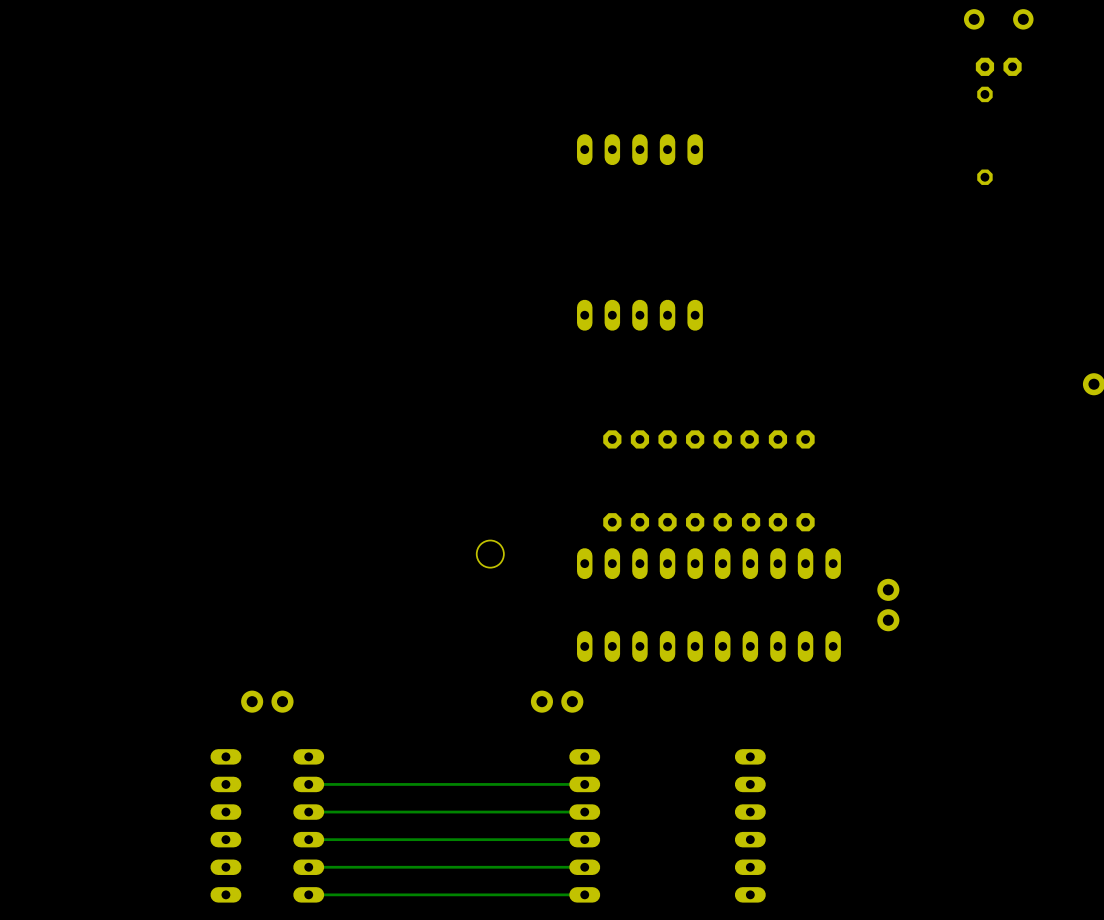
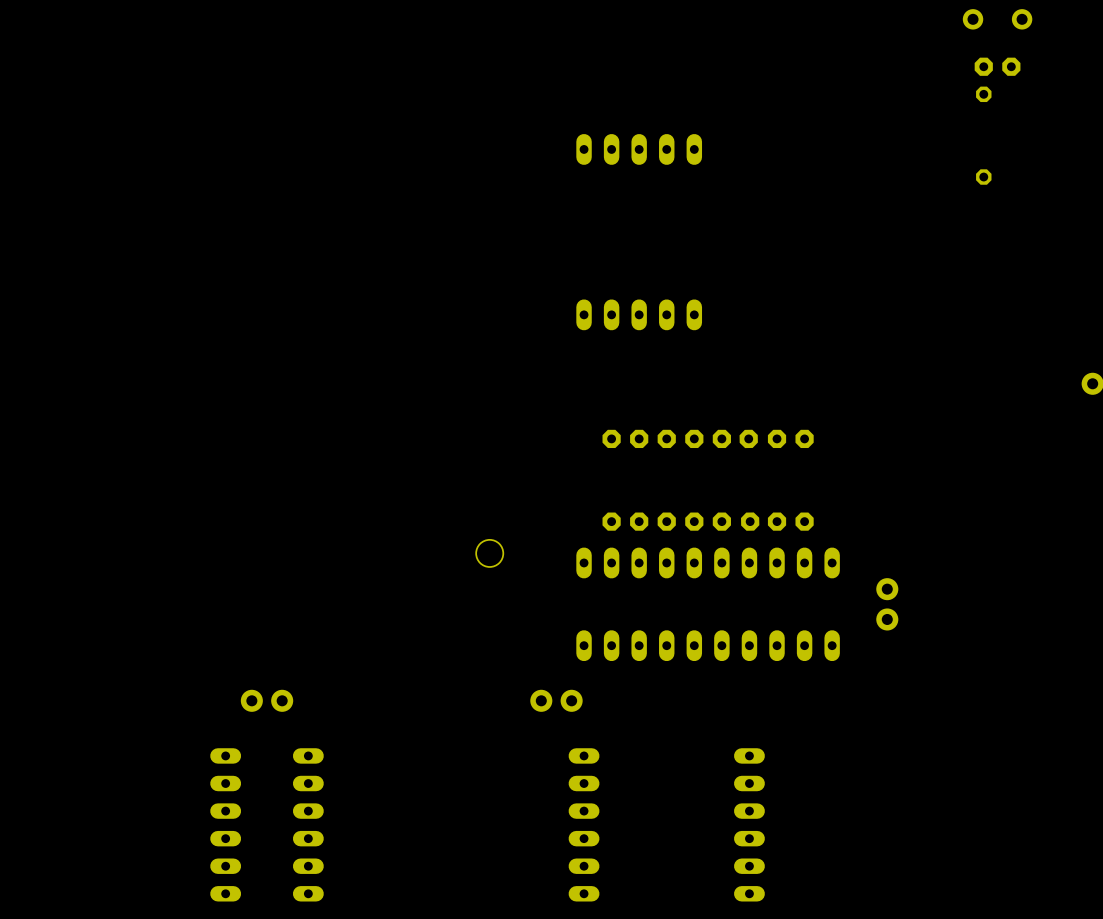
track: (584, 784) (308, 784) -> none
track: (584, 812) (308, 812) -> none
track: (584, 839) (308, 839) -> none
track: (584, 867) (308, 867) -> none
track: (584, 894) (308, 894) -> none

